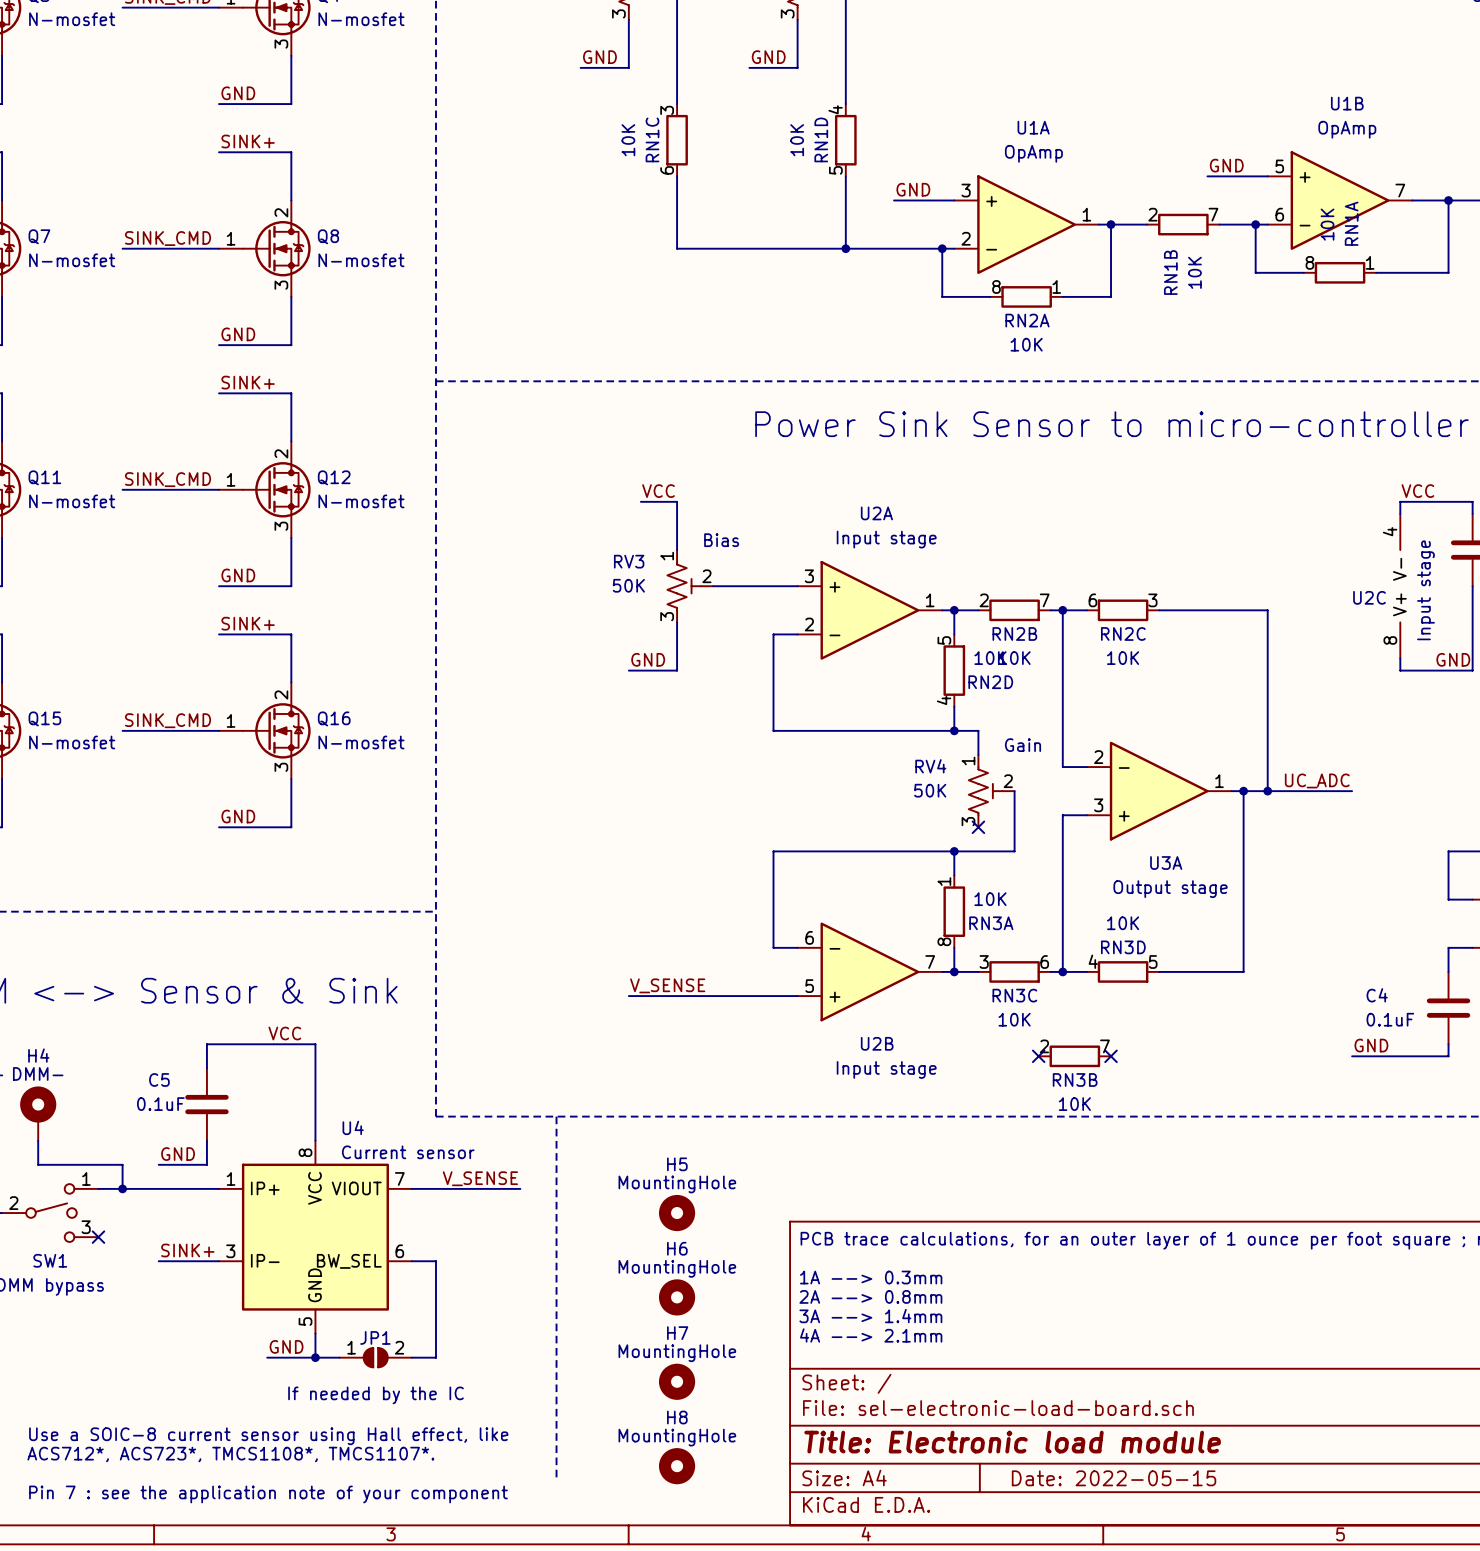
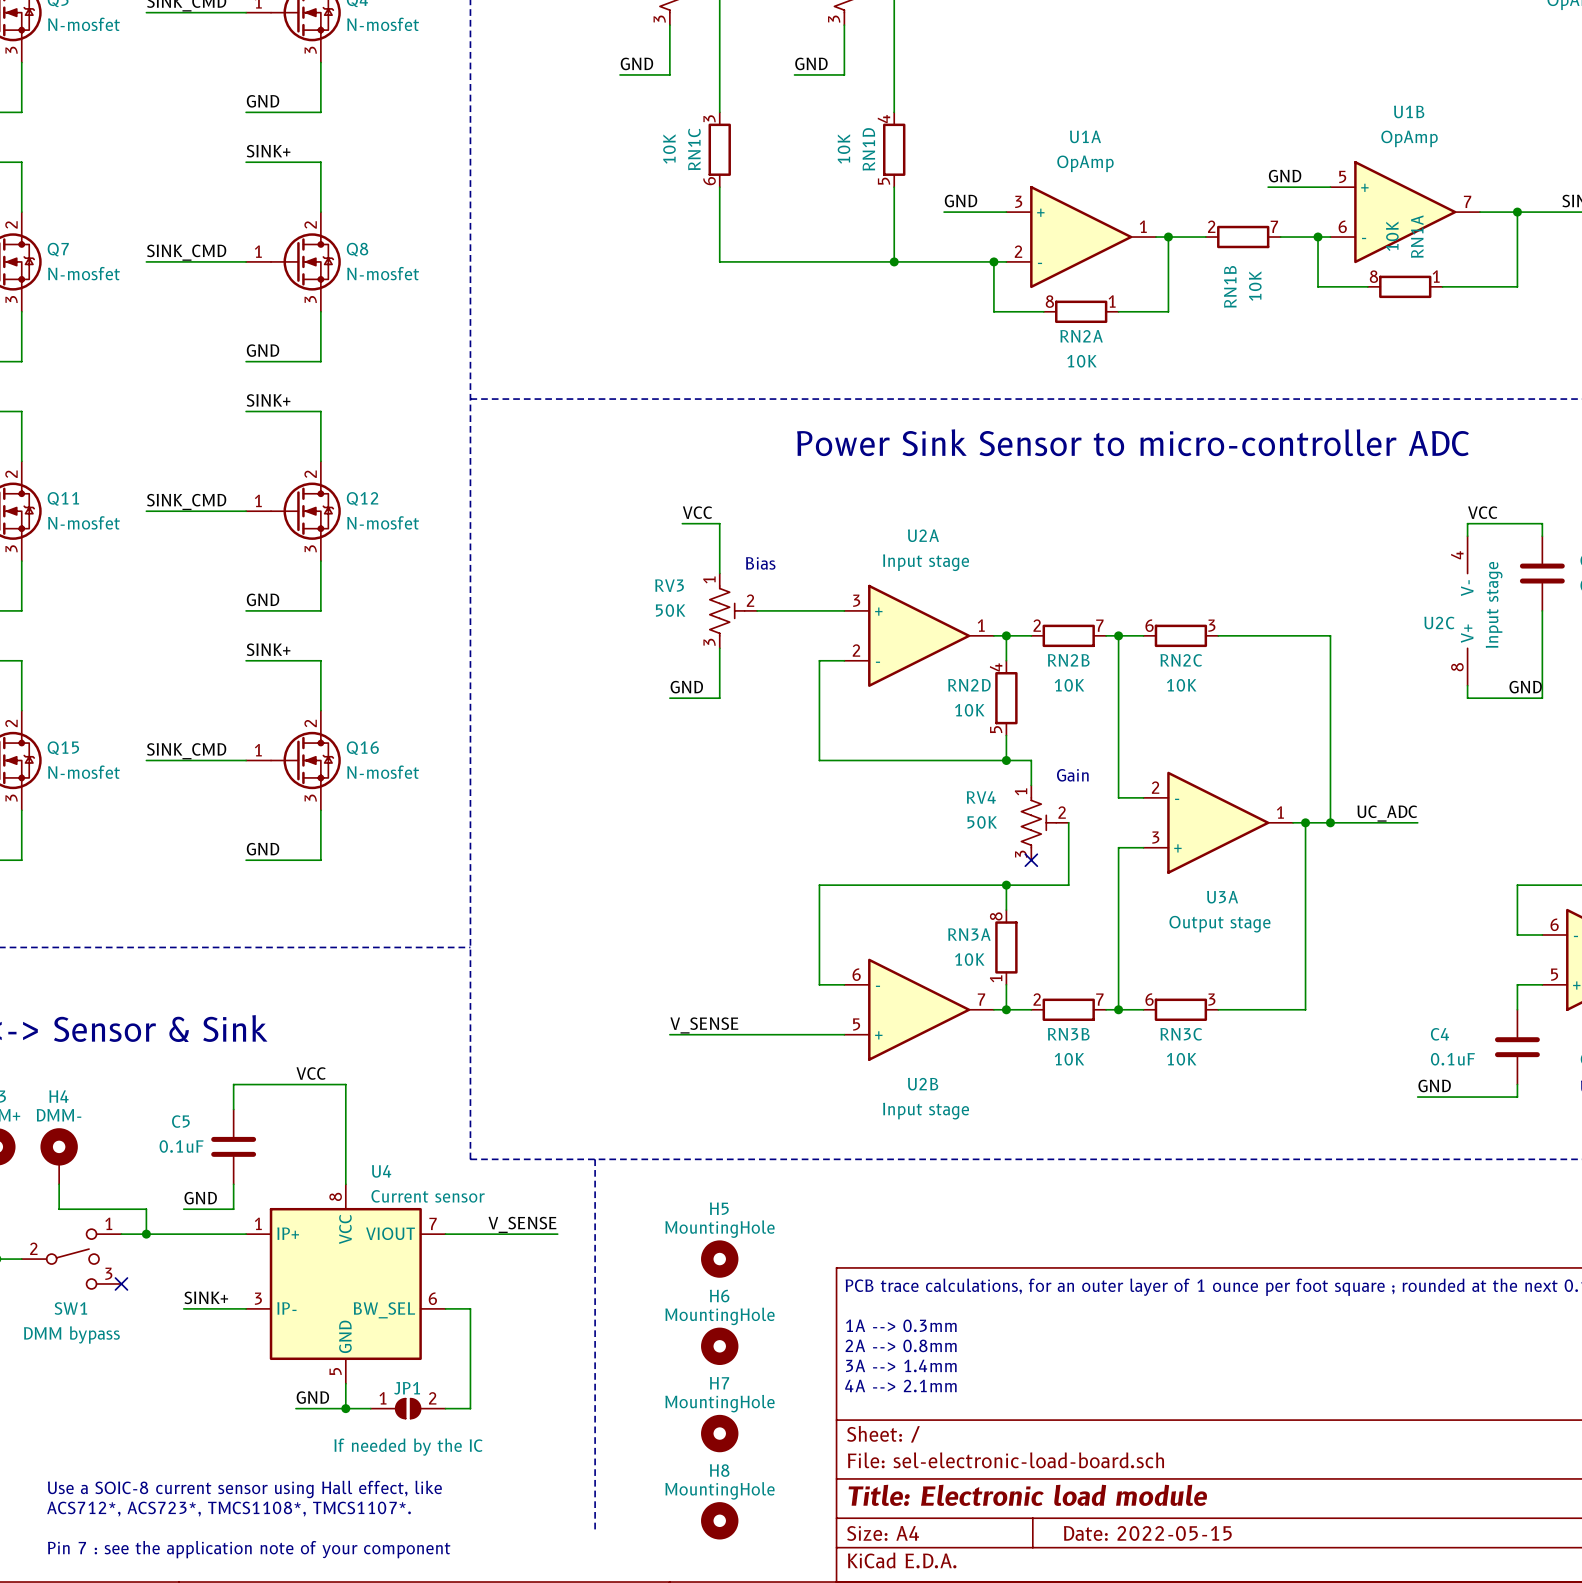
RN2D rotation: 0° (954, 670) -> 180° (1006, 698)
RN3A rotation: 0° (954, 911) -> 180° (1006, 947)
RN3C rotation: 0° (1014, 971) -> 180° (1180, 1009)
RN3C position: (1014, 971) -> (1180, 1009)
RN3D: 10K (1123, 971) -> none
no-connect mark: (1038, 1056) -> none
RN3B position: (1074, 1056) -> (1068, 1009)
no-connect mark: (1111, 1056) -> none

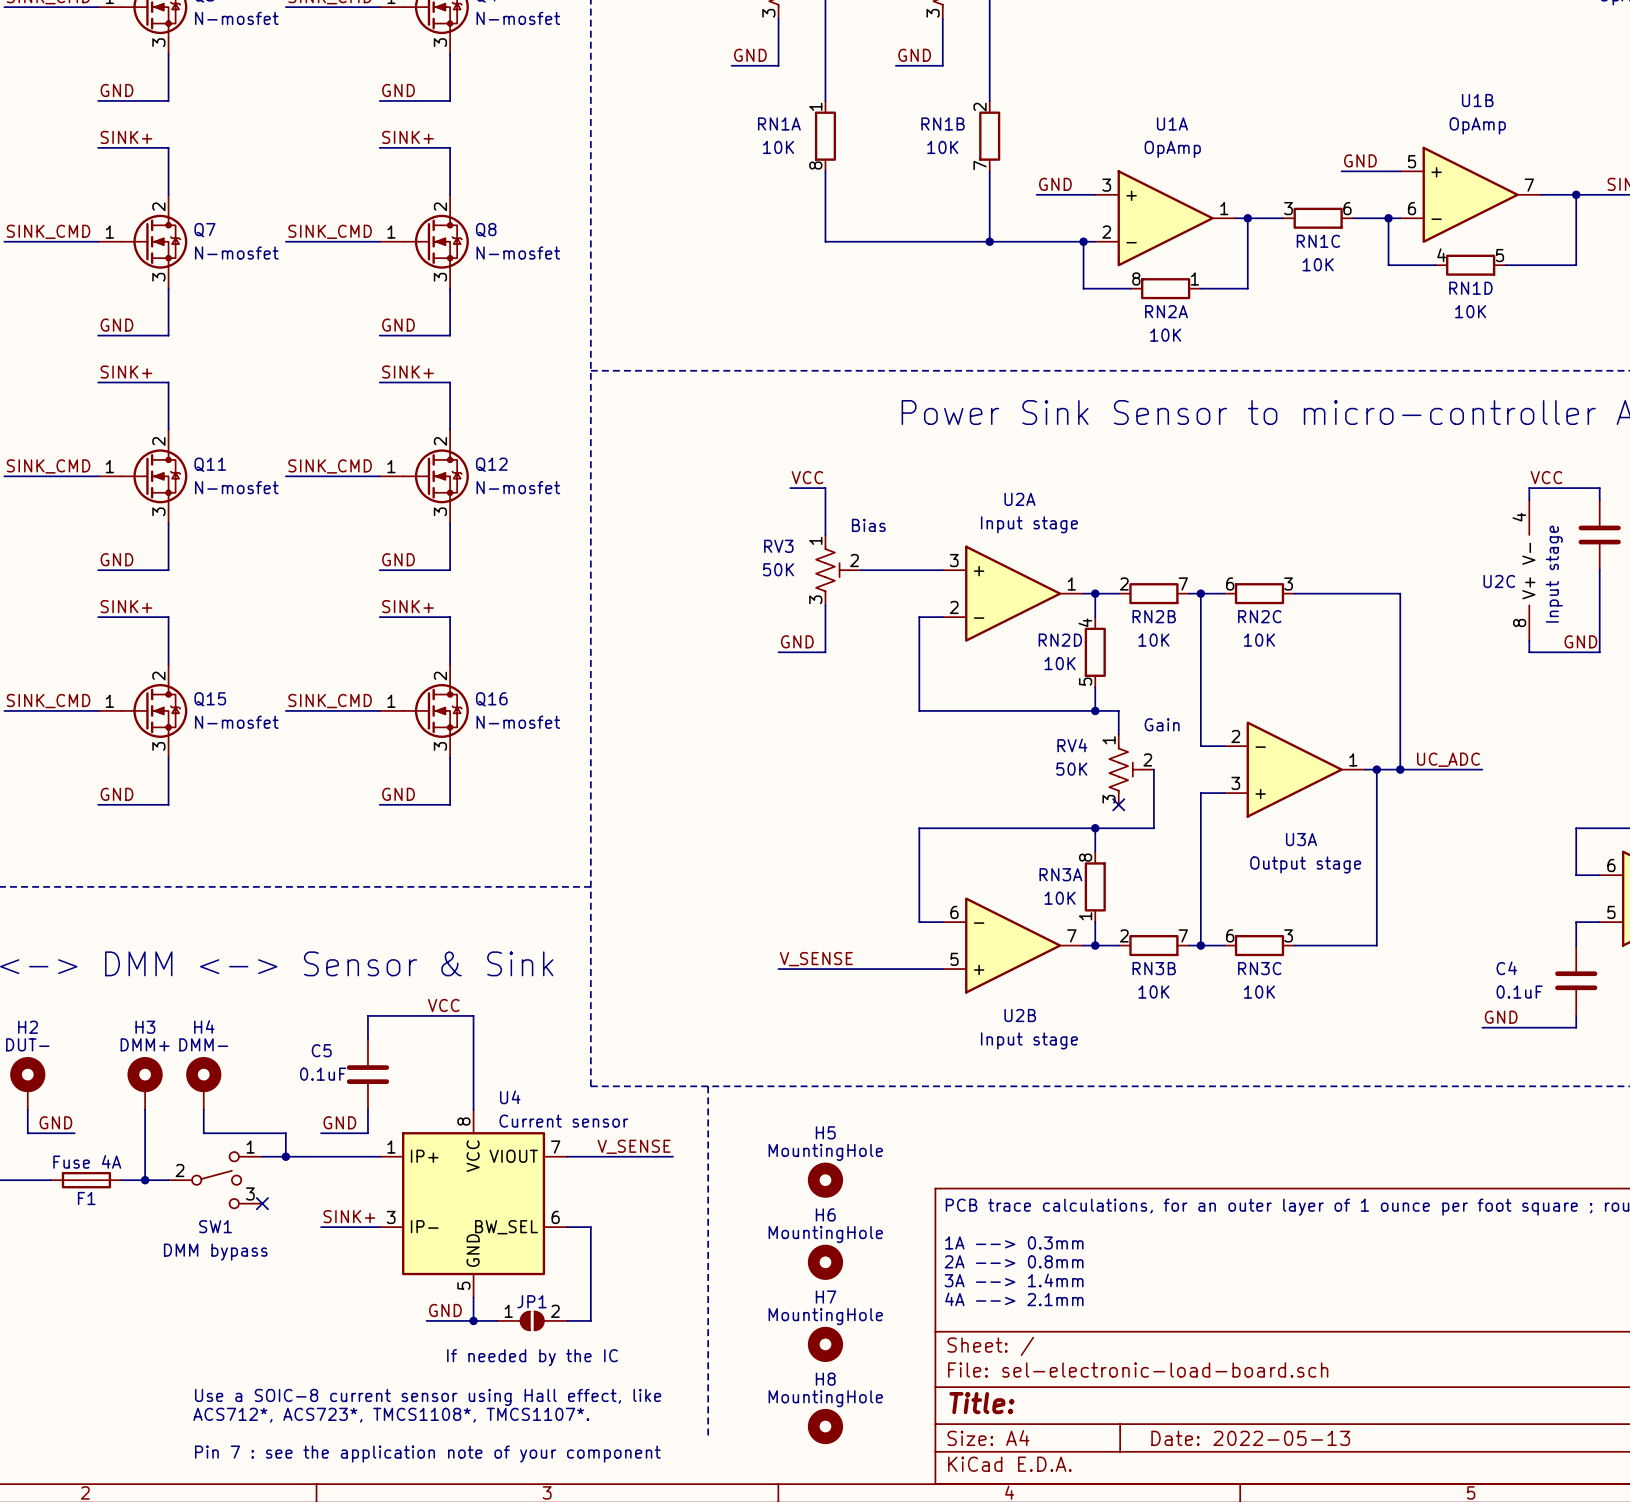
RN1C rotation: 0° (719, 149) -> 90° counterclockwise (1318, 218)
RN1C position: (719, 149) -> (1318, 218)
RN1D rotation: 0° (894, 149) -> 90° counterclockwise (1470, 265)
RN1D position: (894, 149) -> (1470, 265)
RN1B rotation: 0° (1243, 237) -> 90° clockwise (989, 136)
RN1B position: (1243, 237) -> (989, 136)
RN1A rotation: 0° (1405, 286) -> 90° counterclockwise (825, 136)
RN1A position: (1405, 286) -> (825, 136)
title block: Title: Electronic load module (1027, 1495) -> Title: (981, 1403)
title block: Date: 2022-05-15 (1147, 1533) -> Date: 2022-05-13 (1250, 1438)

